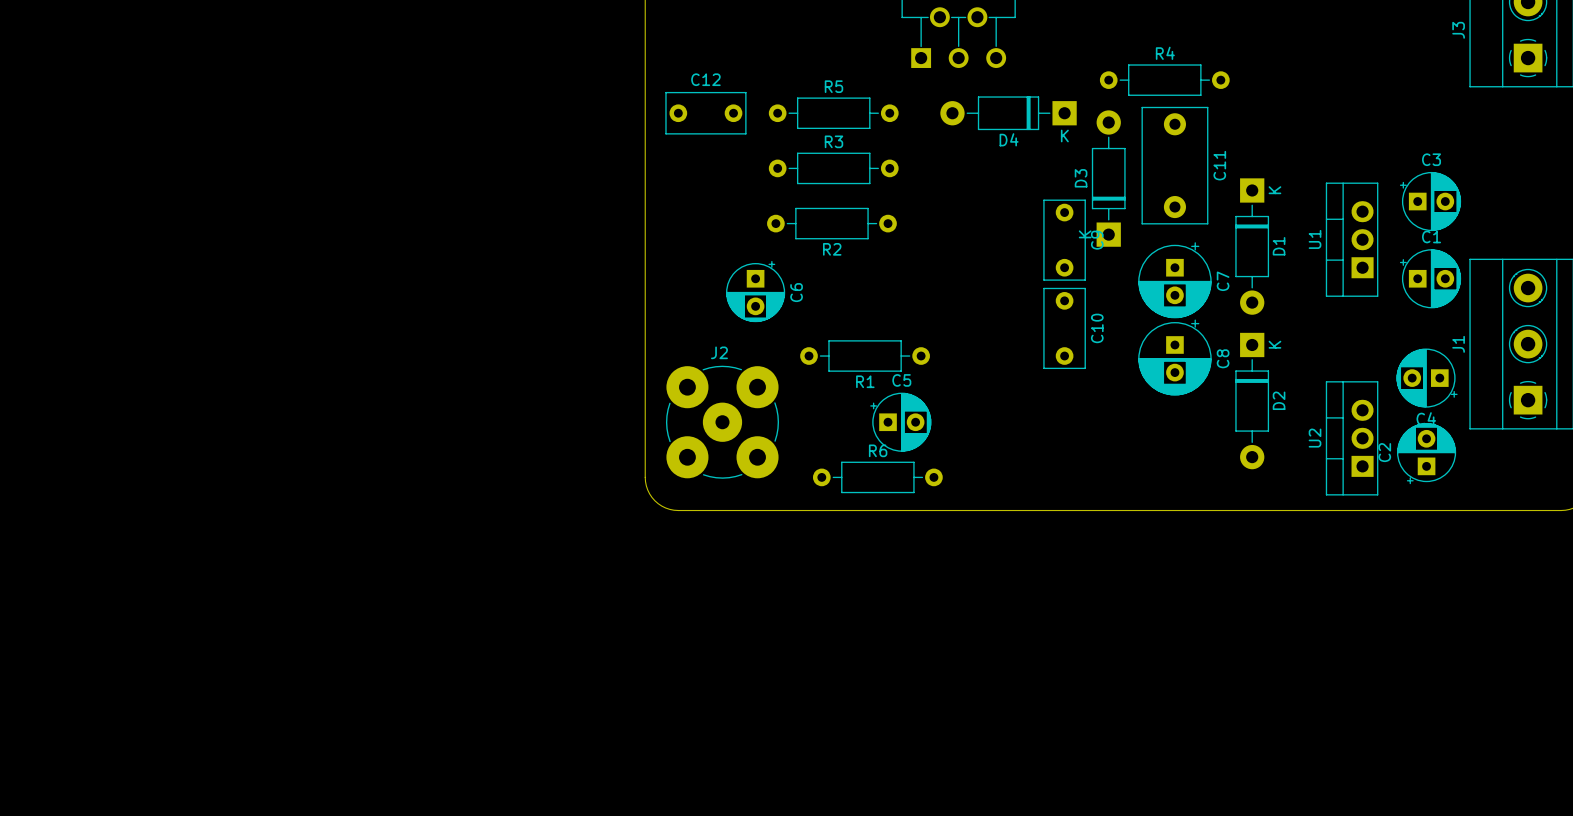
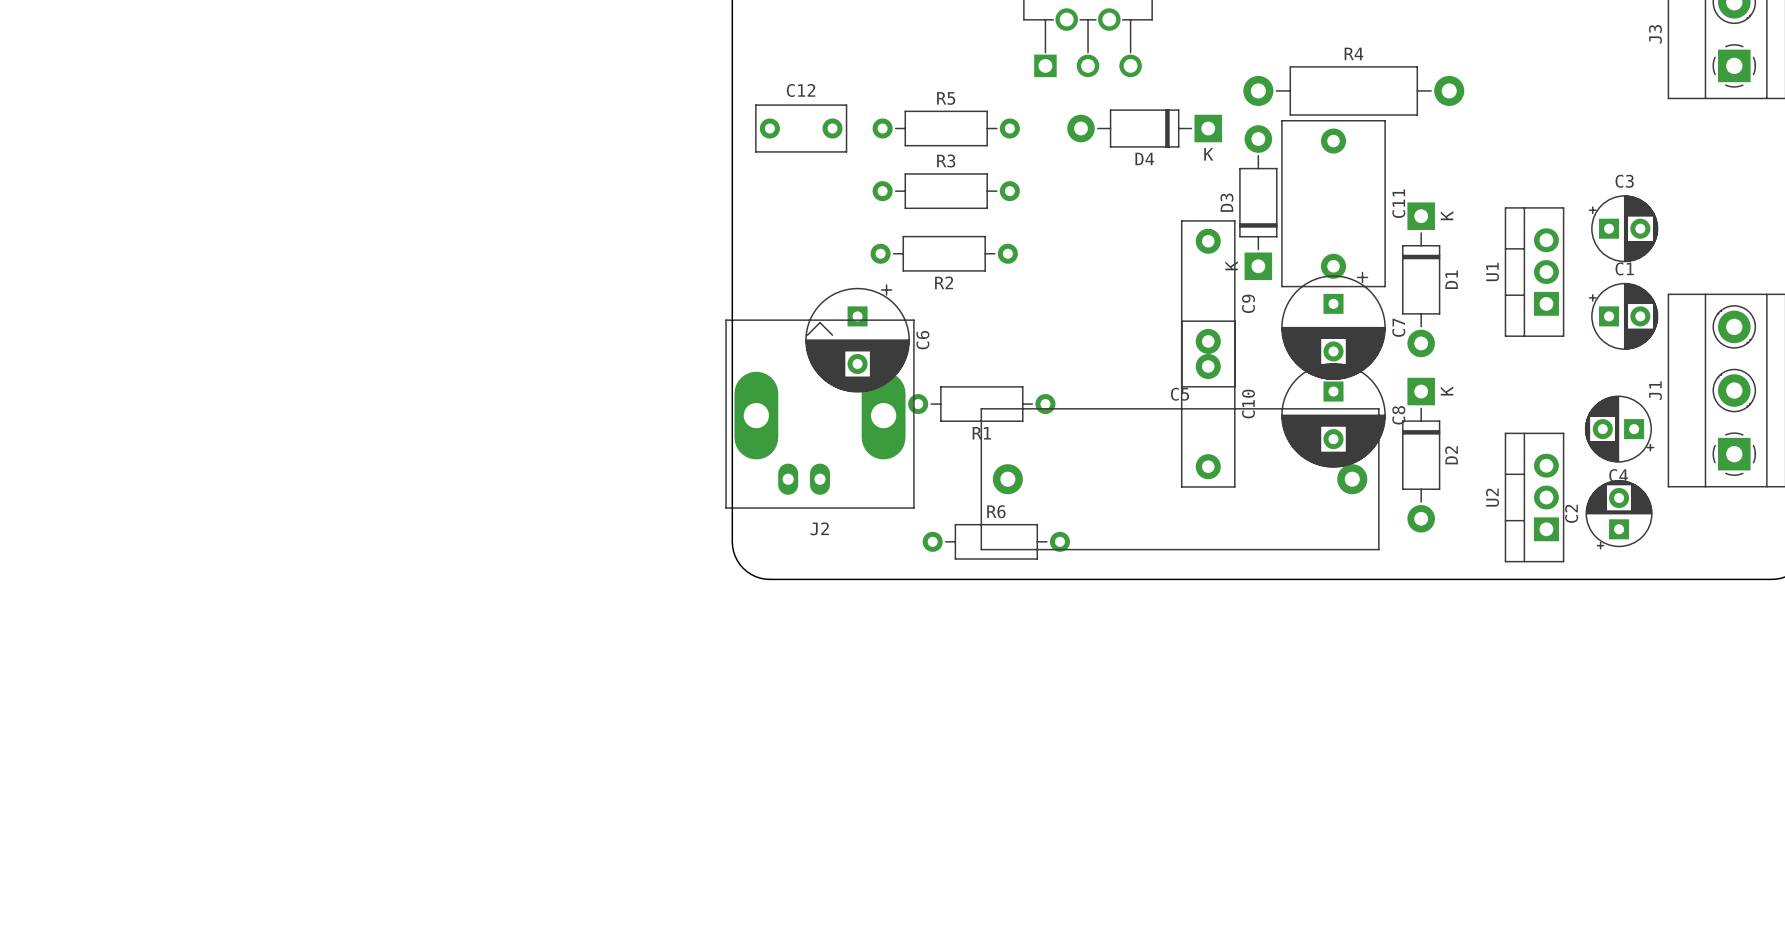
R4 footprint: [1099, 64, 1230, 96] -> [1243, 66, 1465, 116]
C11 footprint: [1141, 106, 1209, 225] -> [1281, 120, 1386, 288]
C9 footprint: [1043, 199, 1086, 281] -> [1180, 220, 1236, 388]
C7 footprint: [1138, 242, 1212, 319] -> [1281, 271, 1386, 381]
C6 footprint: [726, 260, 786, 323] -> [805, 284, 910, 393]
C10 footprint: [1043, 287, 1086, 370] -> [1180, 320, 1236, 488]
C8 footprint: [1138, 319, 1212, 396] -> [1281, 359, 1386, 468]
J2 name position: J2 (719, 352) -> J2 (819, 528)
J2 footprint: [665, 365, 780, 479] -> [725, 319, 915, 509]
C5 name position: C5 (901, 380) -> C5 (1179, 394)
C5 footprint: [870, 392, 932, 452] -> [980, 408, 1380, 551]

